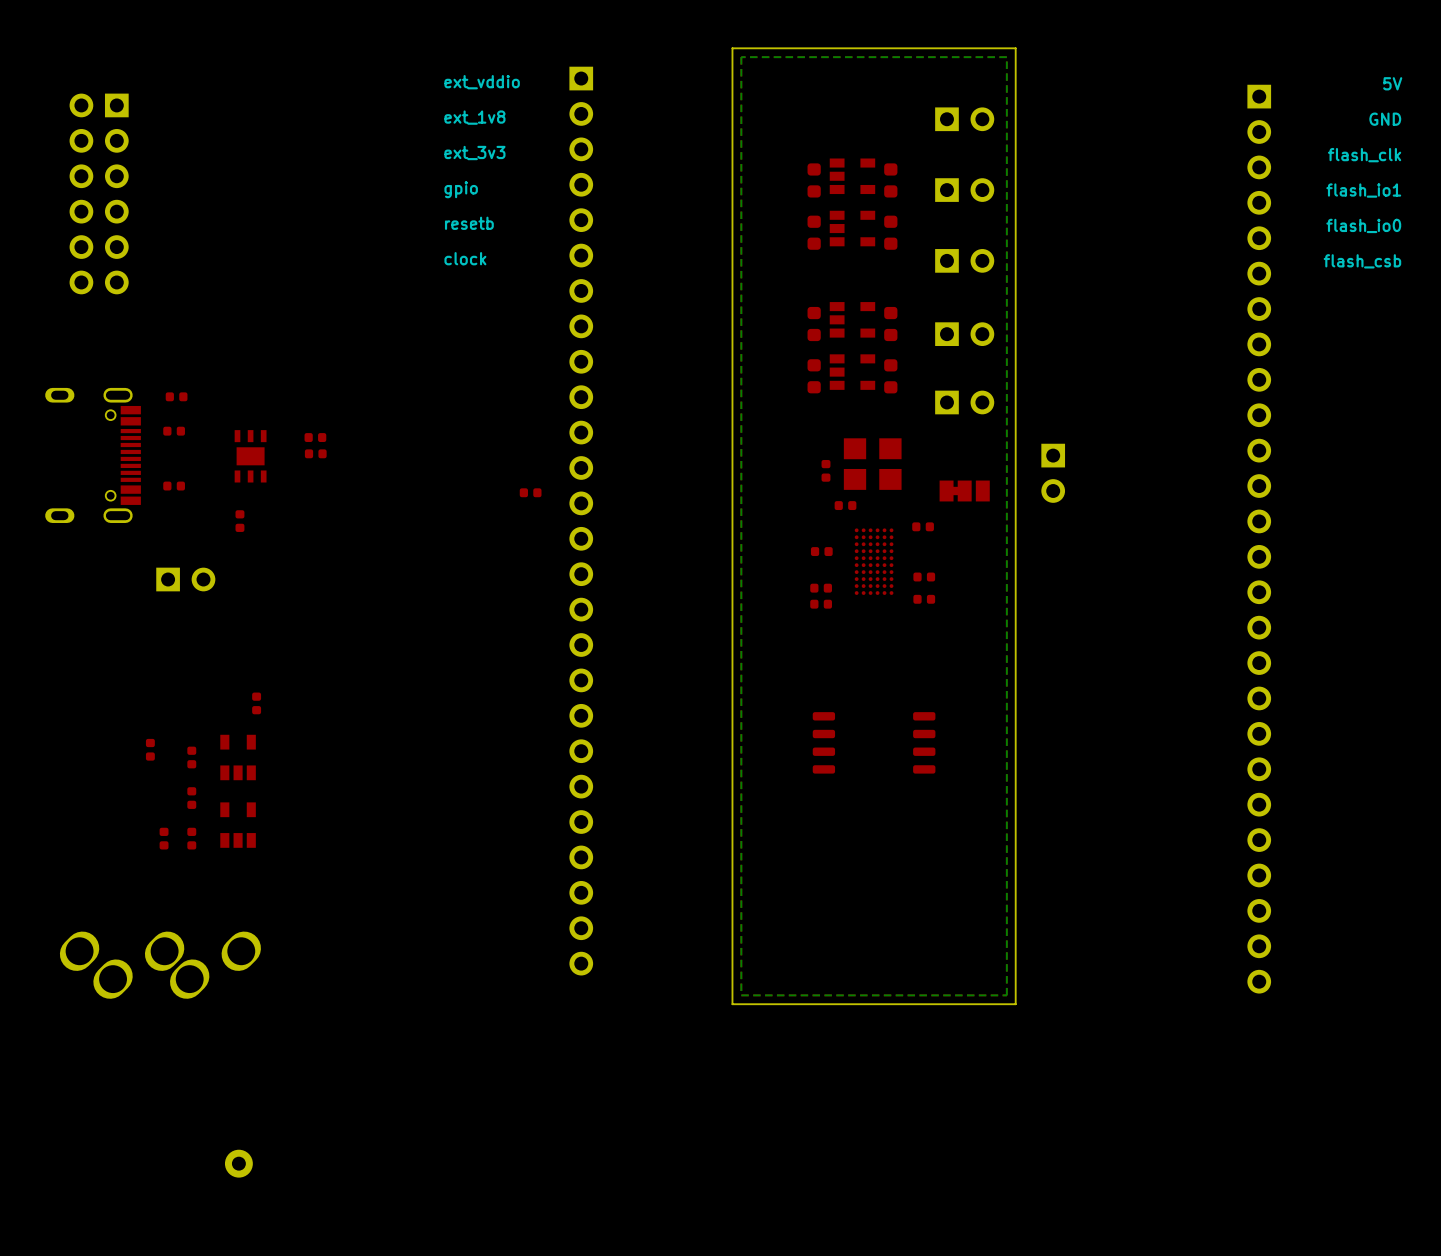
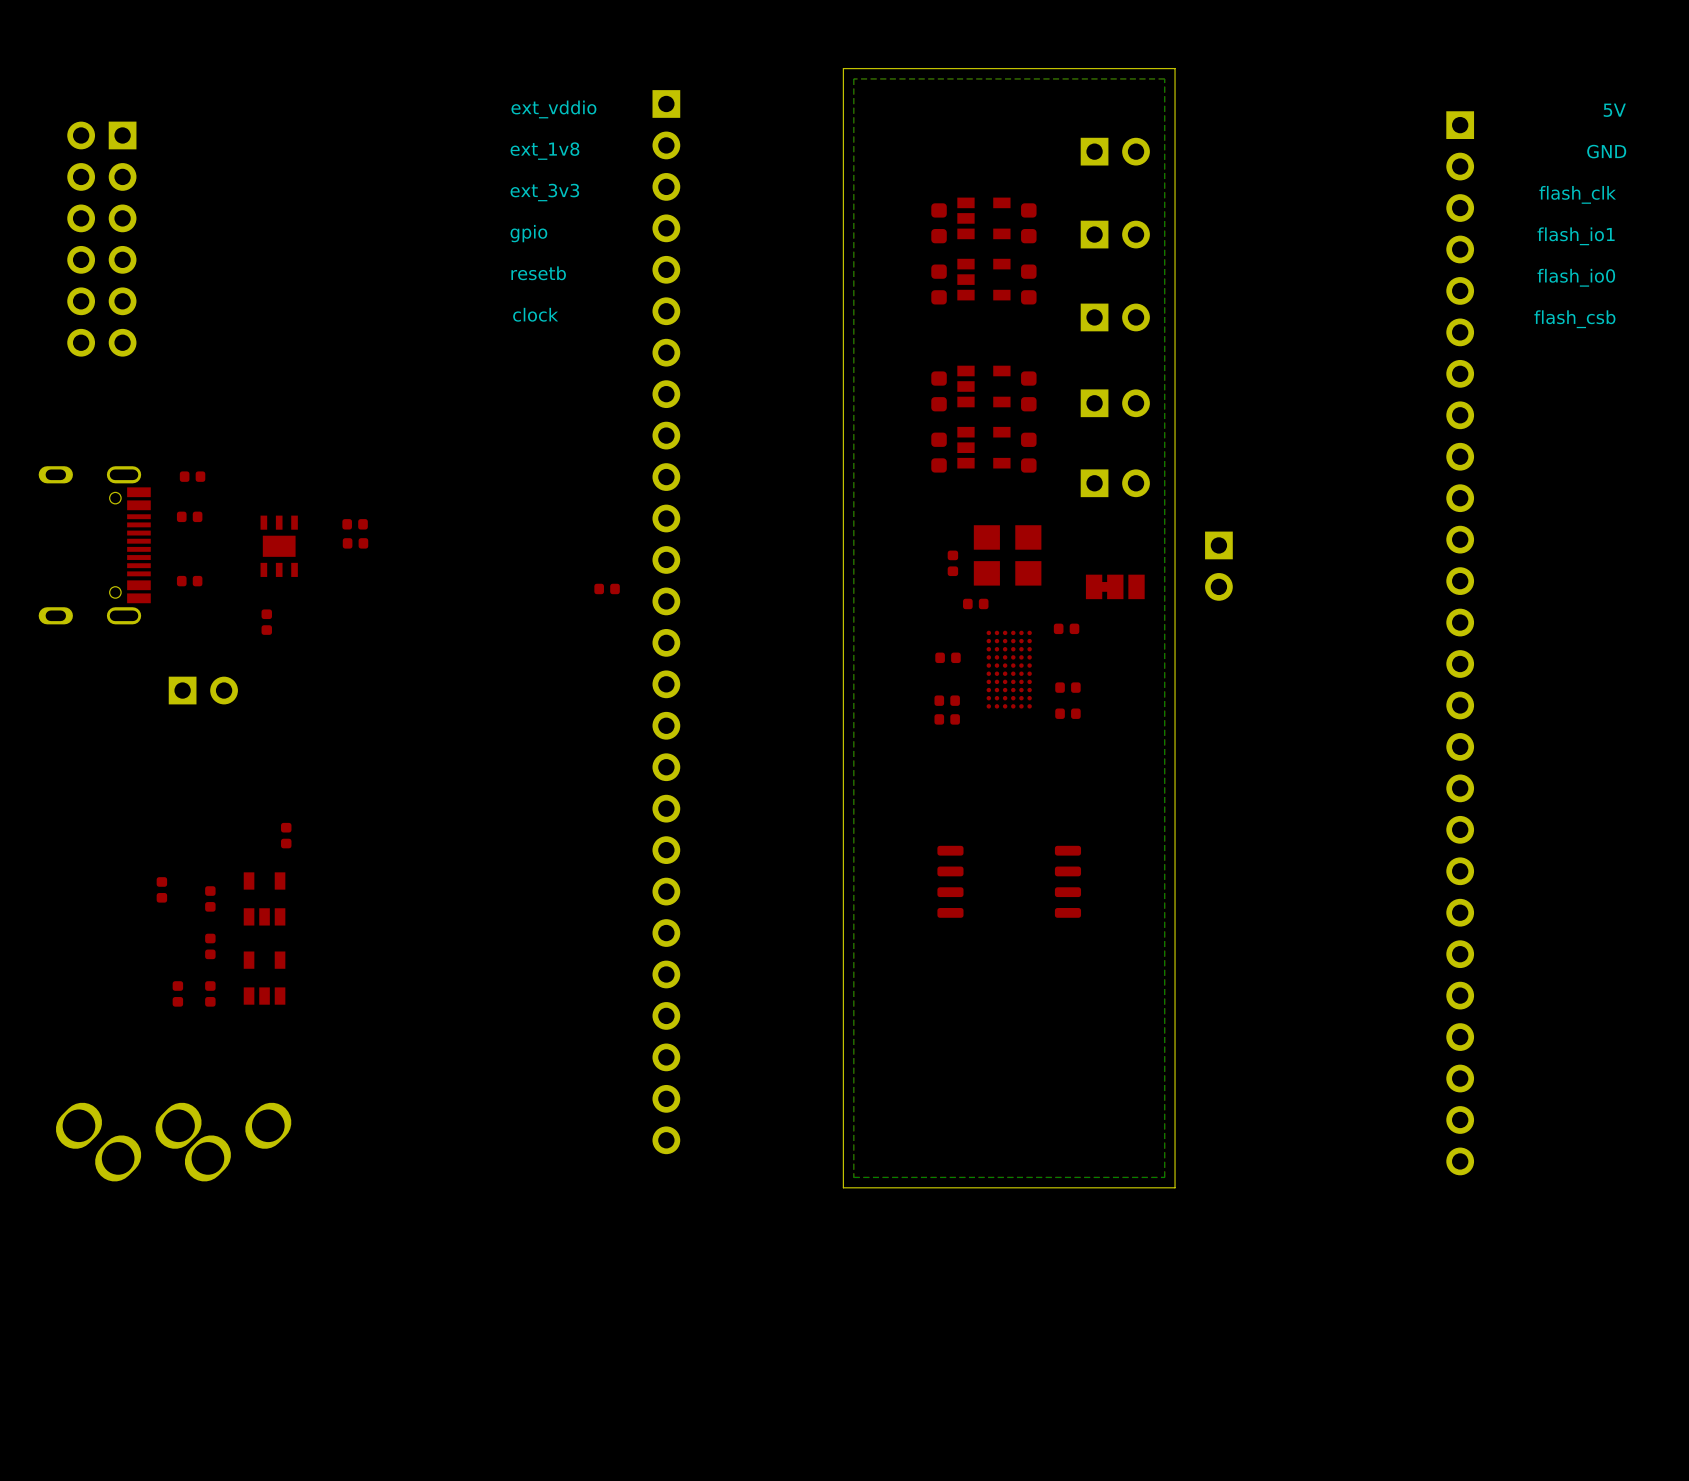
part: (238, 1163) -> none

